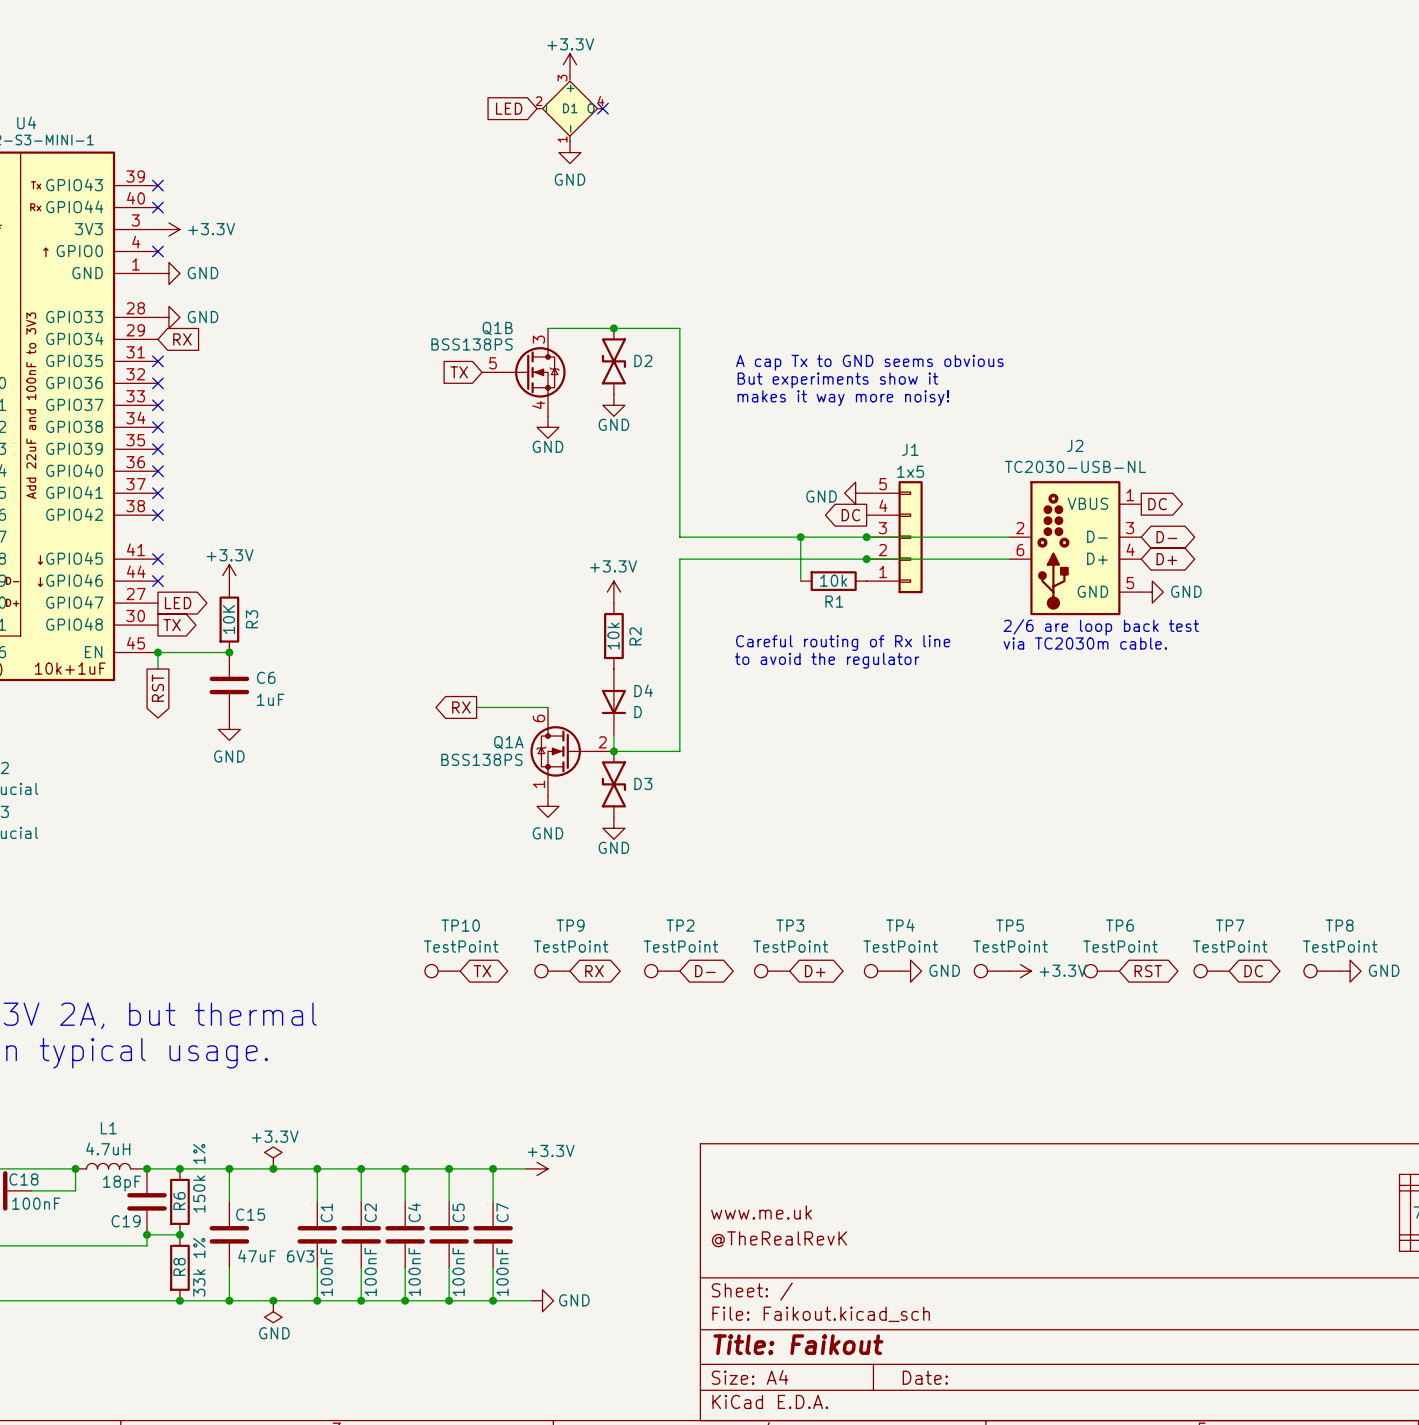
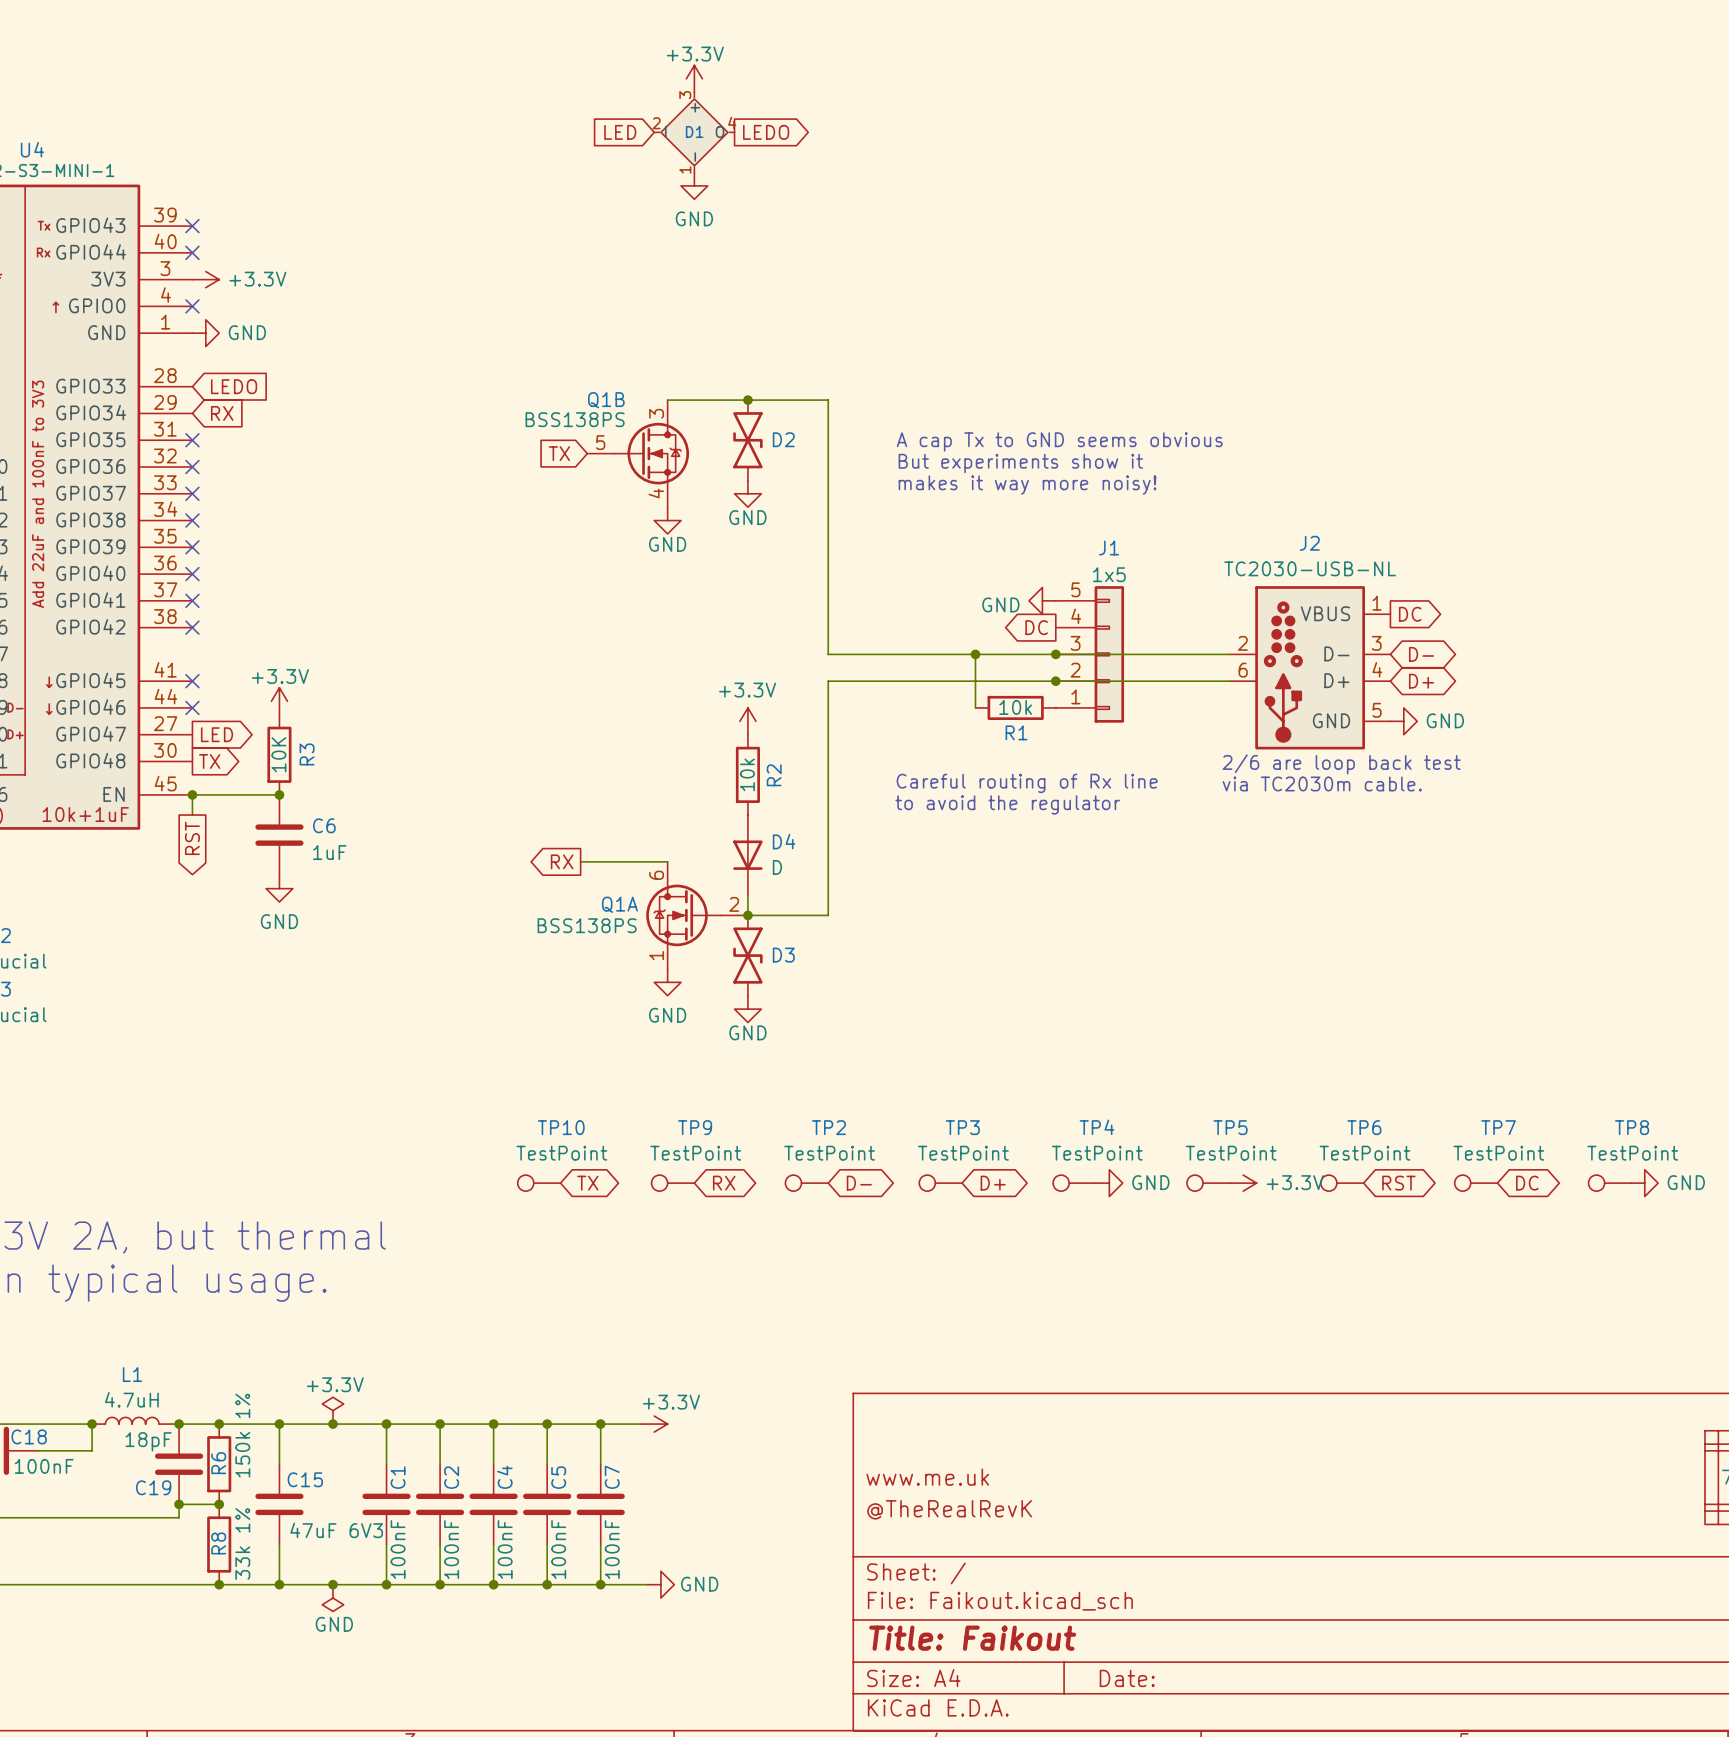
no-connect mark: (602, 108) -> none
global label: none -> LEDO (766, 132)
power symbol: GND (168, 317) -> none
global label: none -> LEDO (234, 386)

